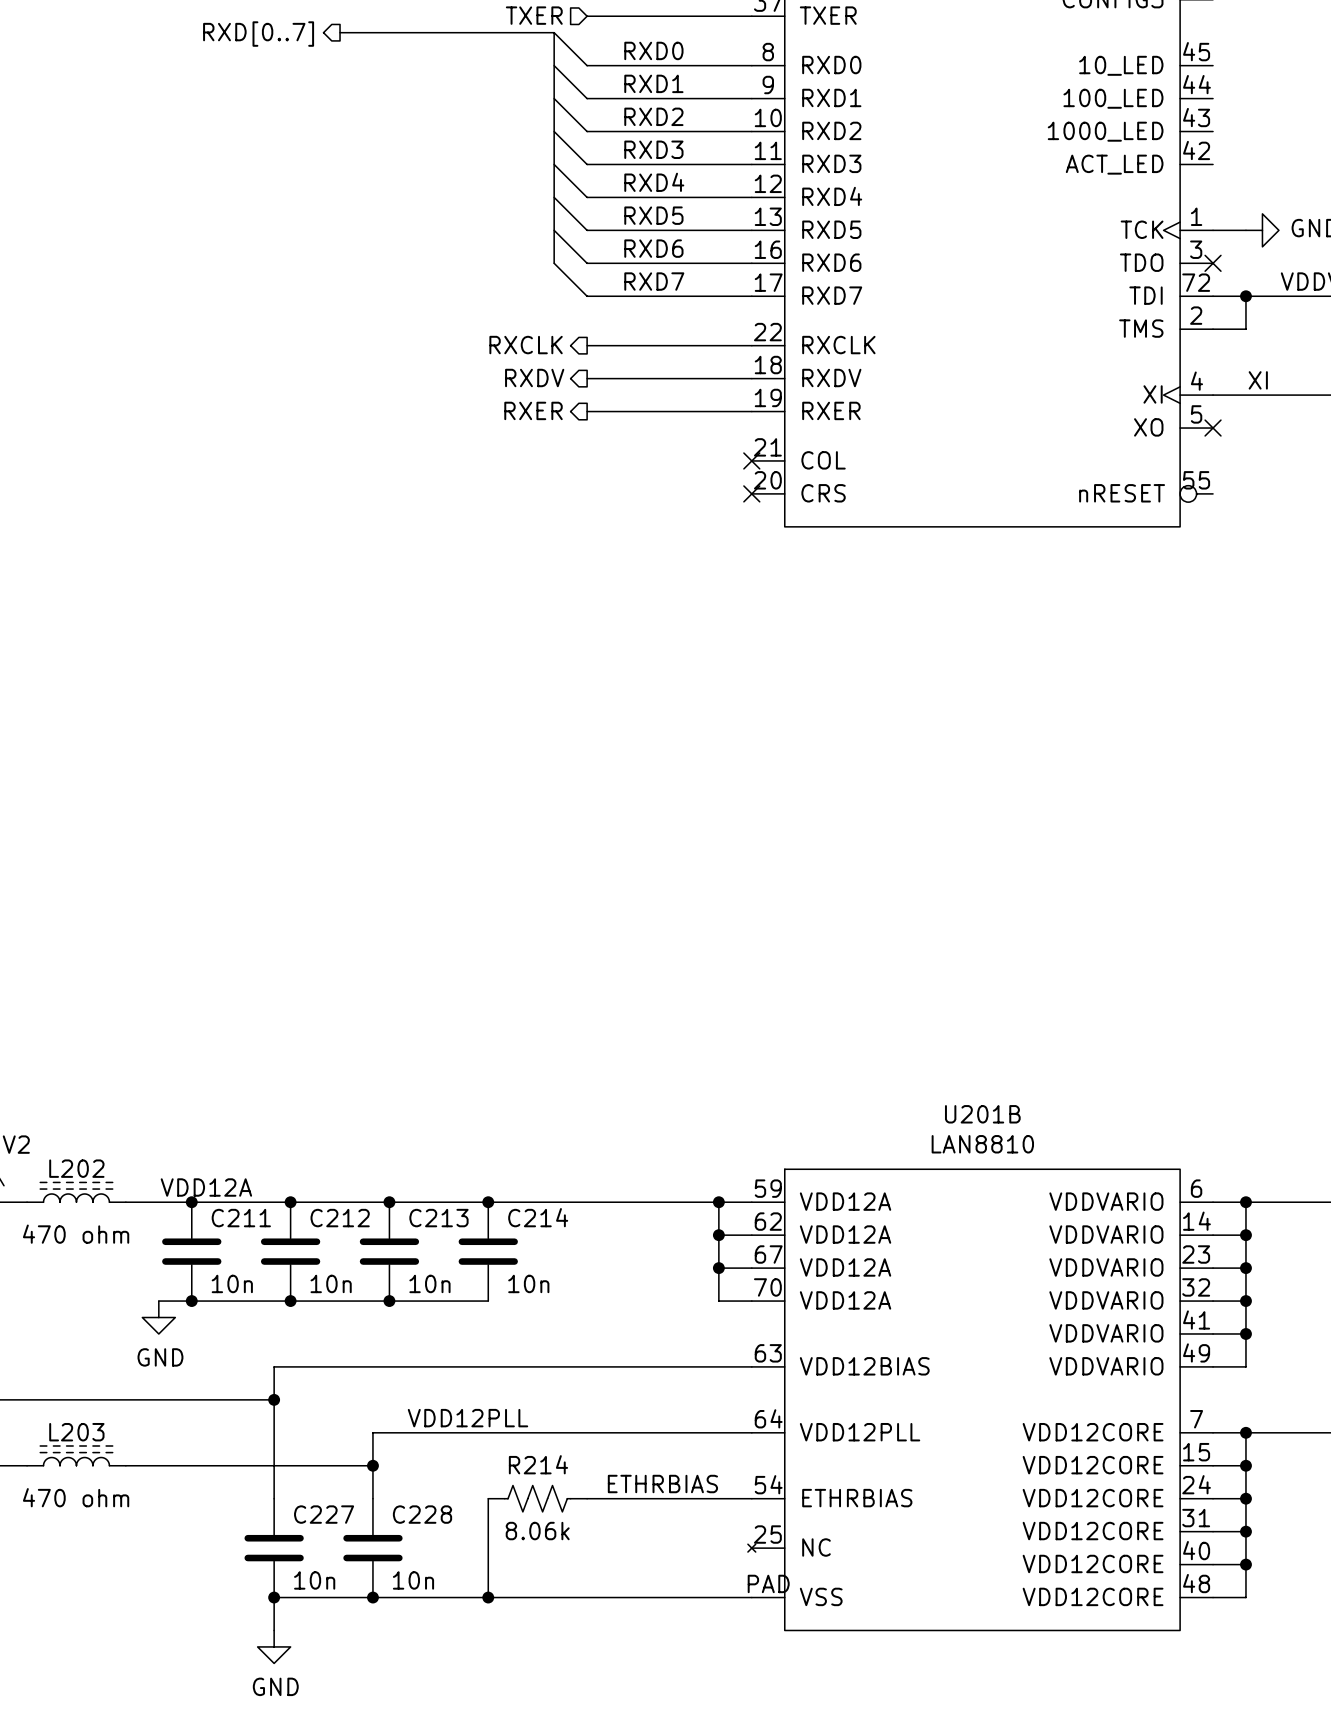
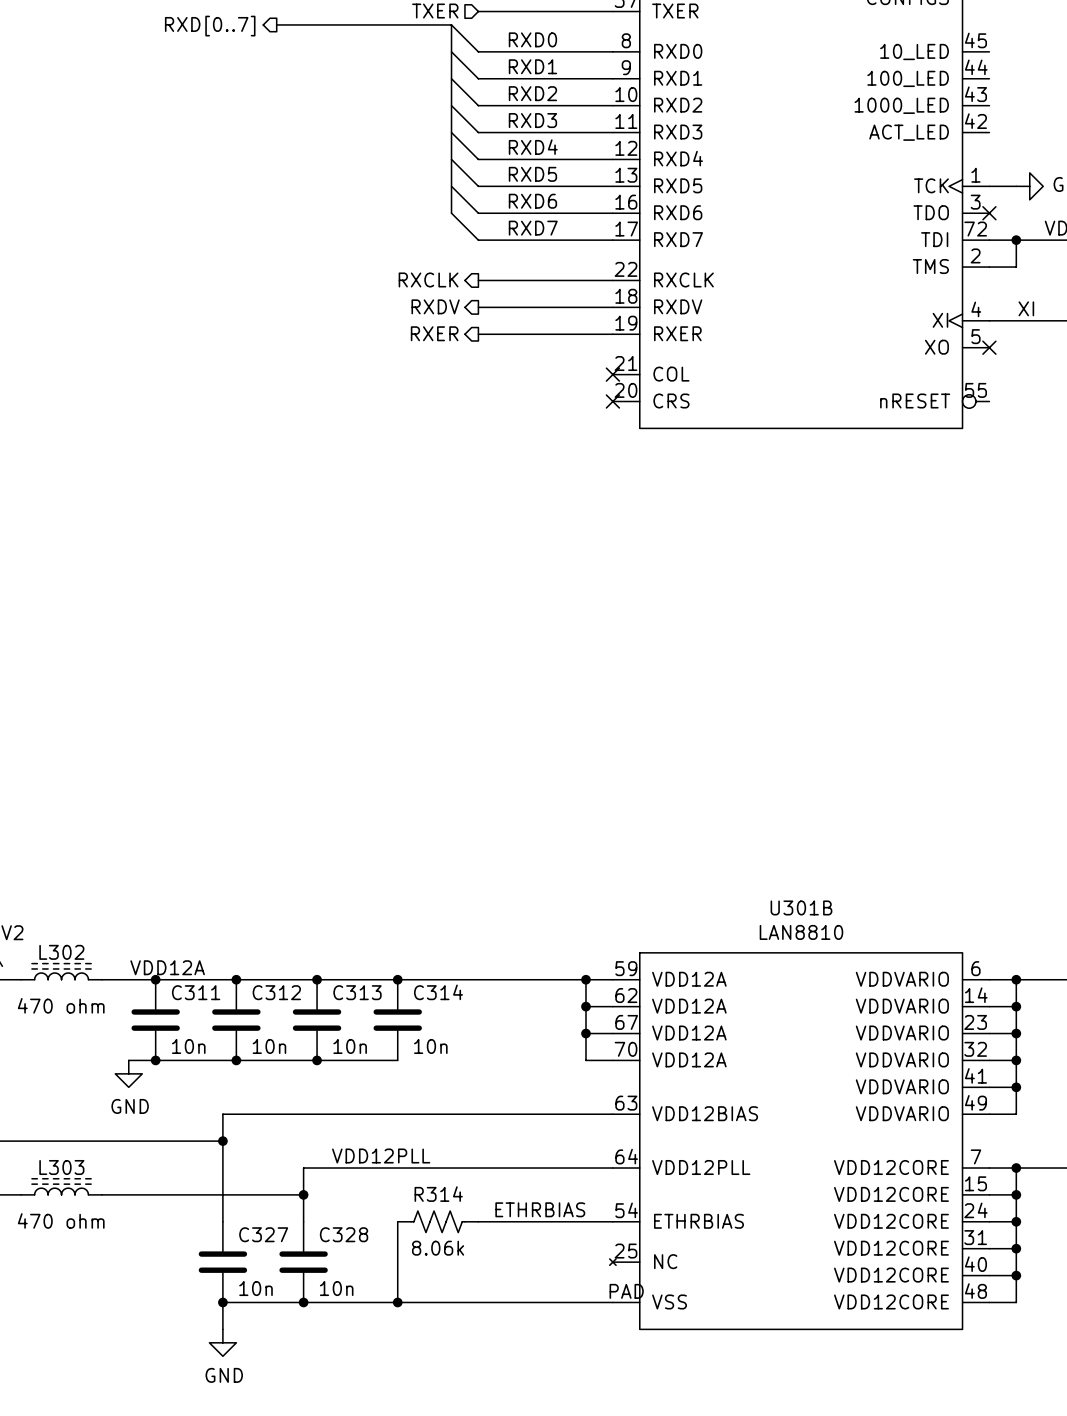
U201B name: U201B (982, 1114) -> U301B (801, 907)
L202 name: L202 (76, 1168) -> L302 (61, 952)
C214 name: C214 (538, 1217) -> C314 (438, 992)
C211 name: C211 (241, 1218) -> C311 (196, 992)
C212 name: C212 (340, 1218) -> C312 (276, 992)
C213 name: C213 (438, 1218) -> C313 (357, 992)
L203 name: L203 (76, 1432) -> L303 (61, 1167)
R214 name: R214 (538, 1464) -> R314 (438, 1194)
C227 name: C227 (324, 1514) -> C327 (263, 1234)
C228 name: C228 (422, 1514) -> C328 (344, 1234)

